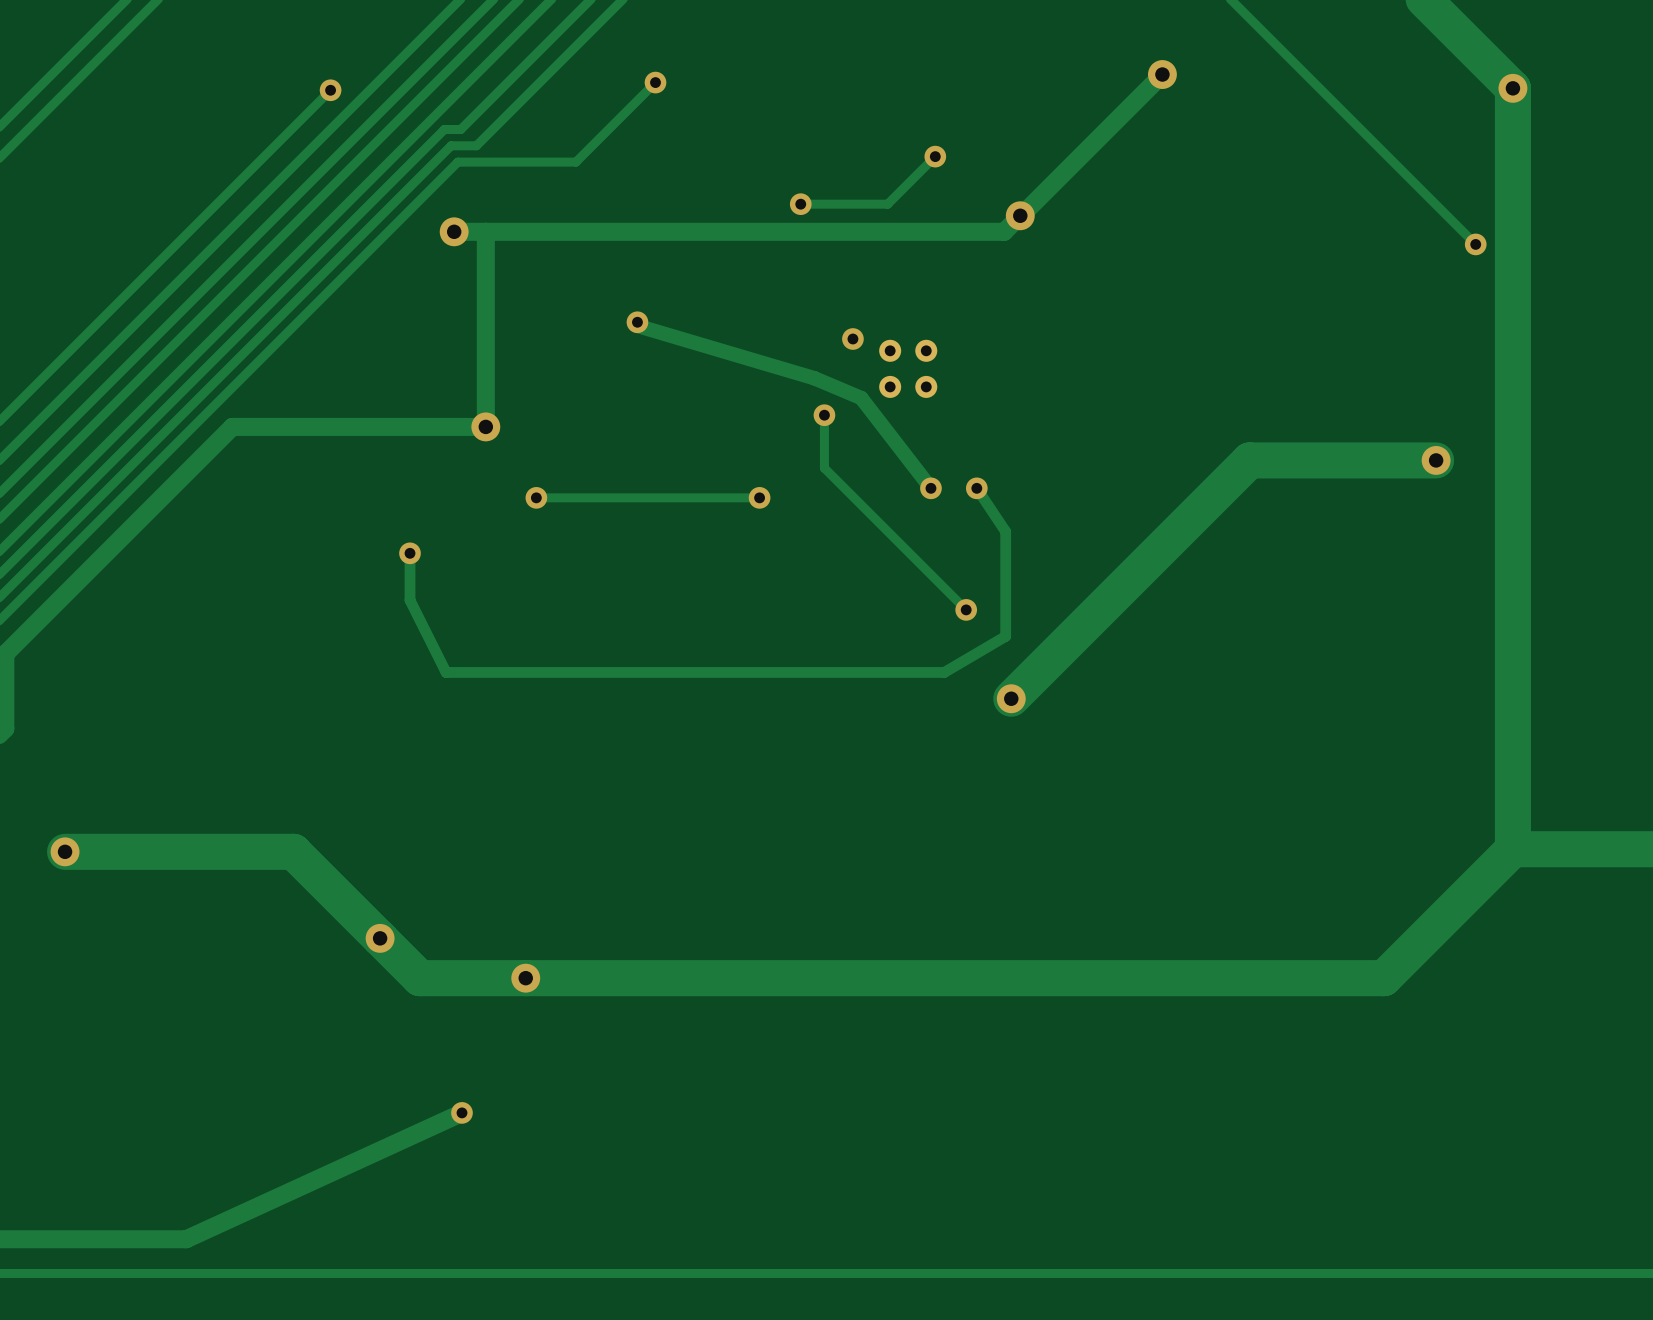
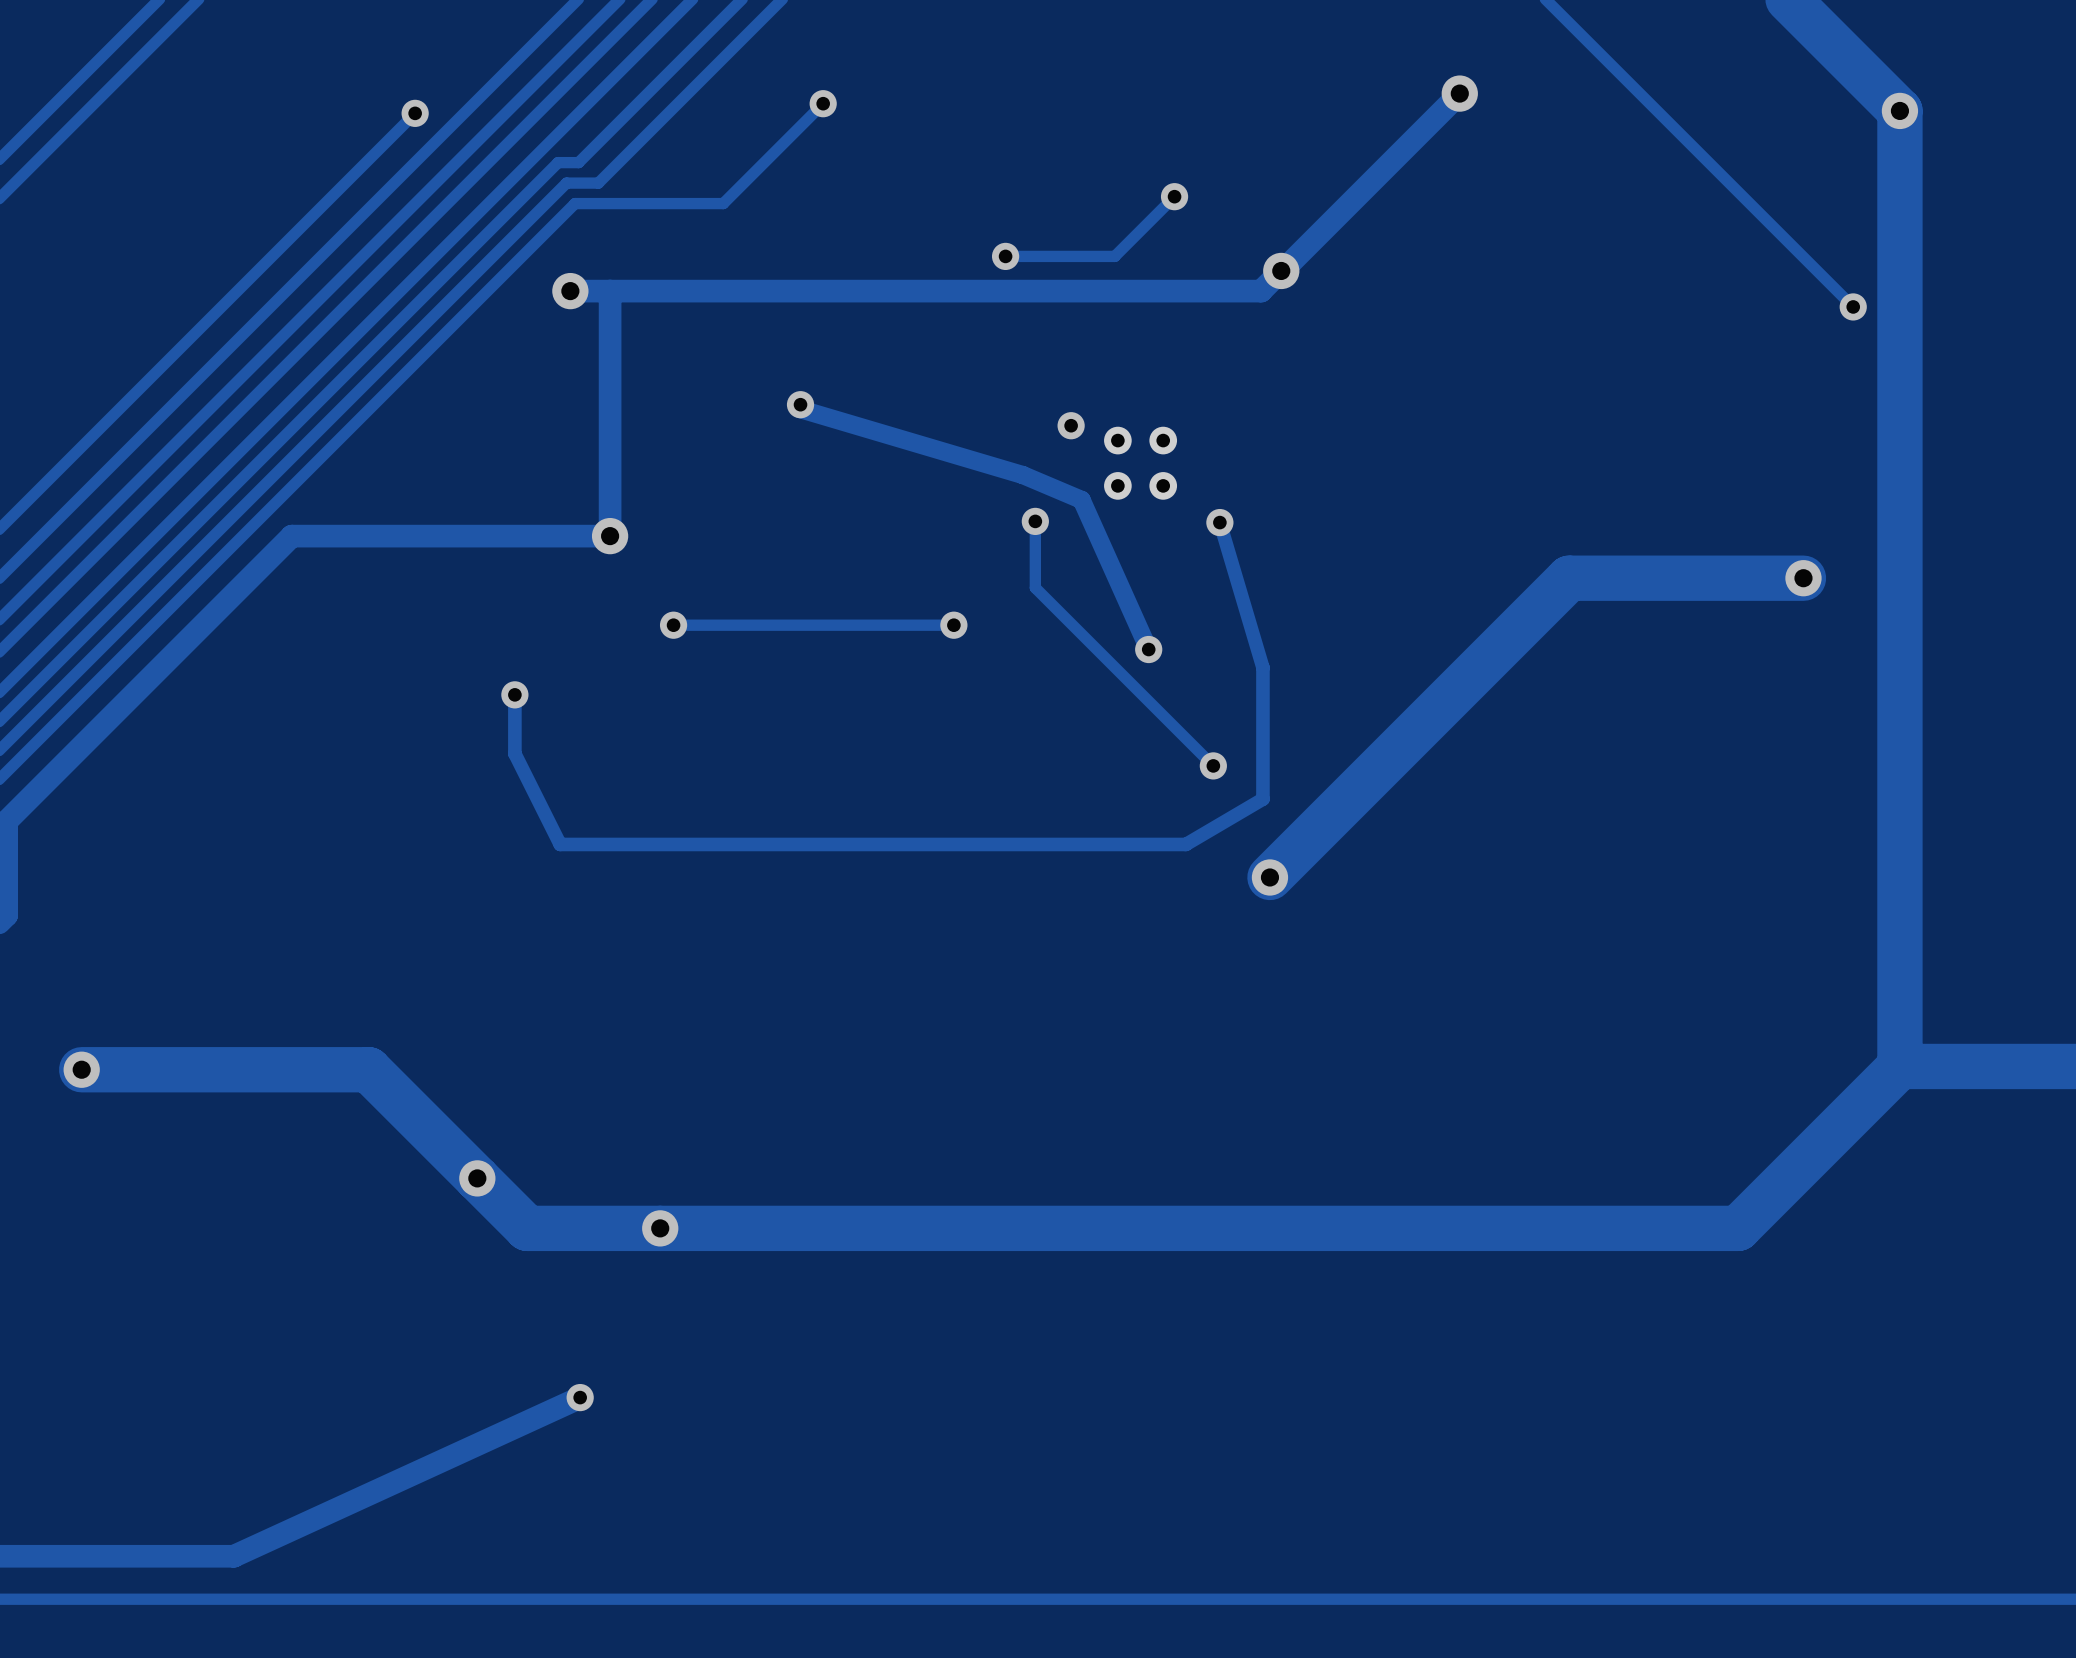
track: (861, 398) (930, 488) -> (1081, 499) (1148, 649)
via: none -> (1219, 522)
via position: (930, 488) -> (1148, 649)
track: (976, 488) (1005, 531) -> (1219, 522) (1262, 667)
via: (976, 488) -> none

